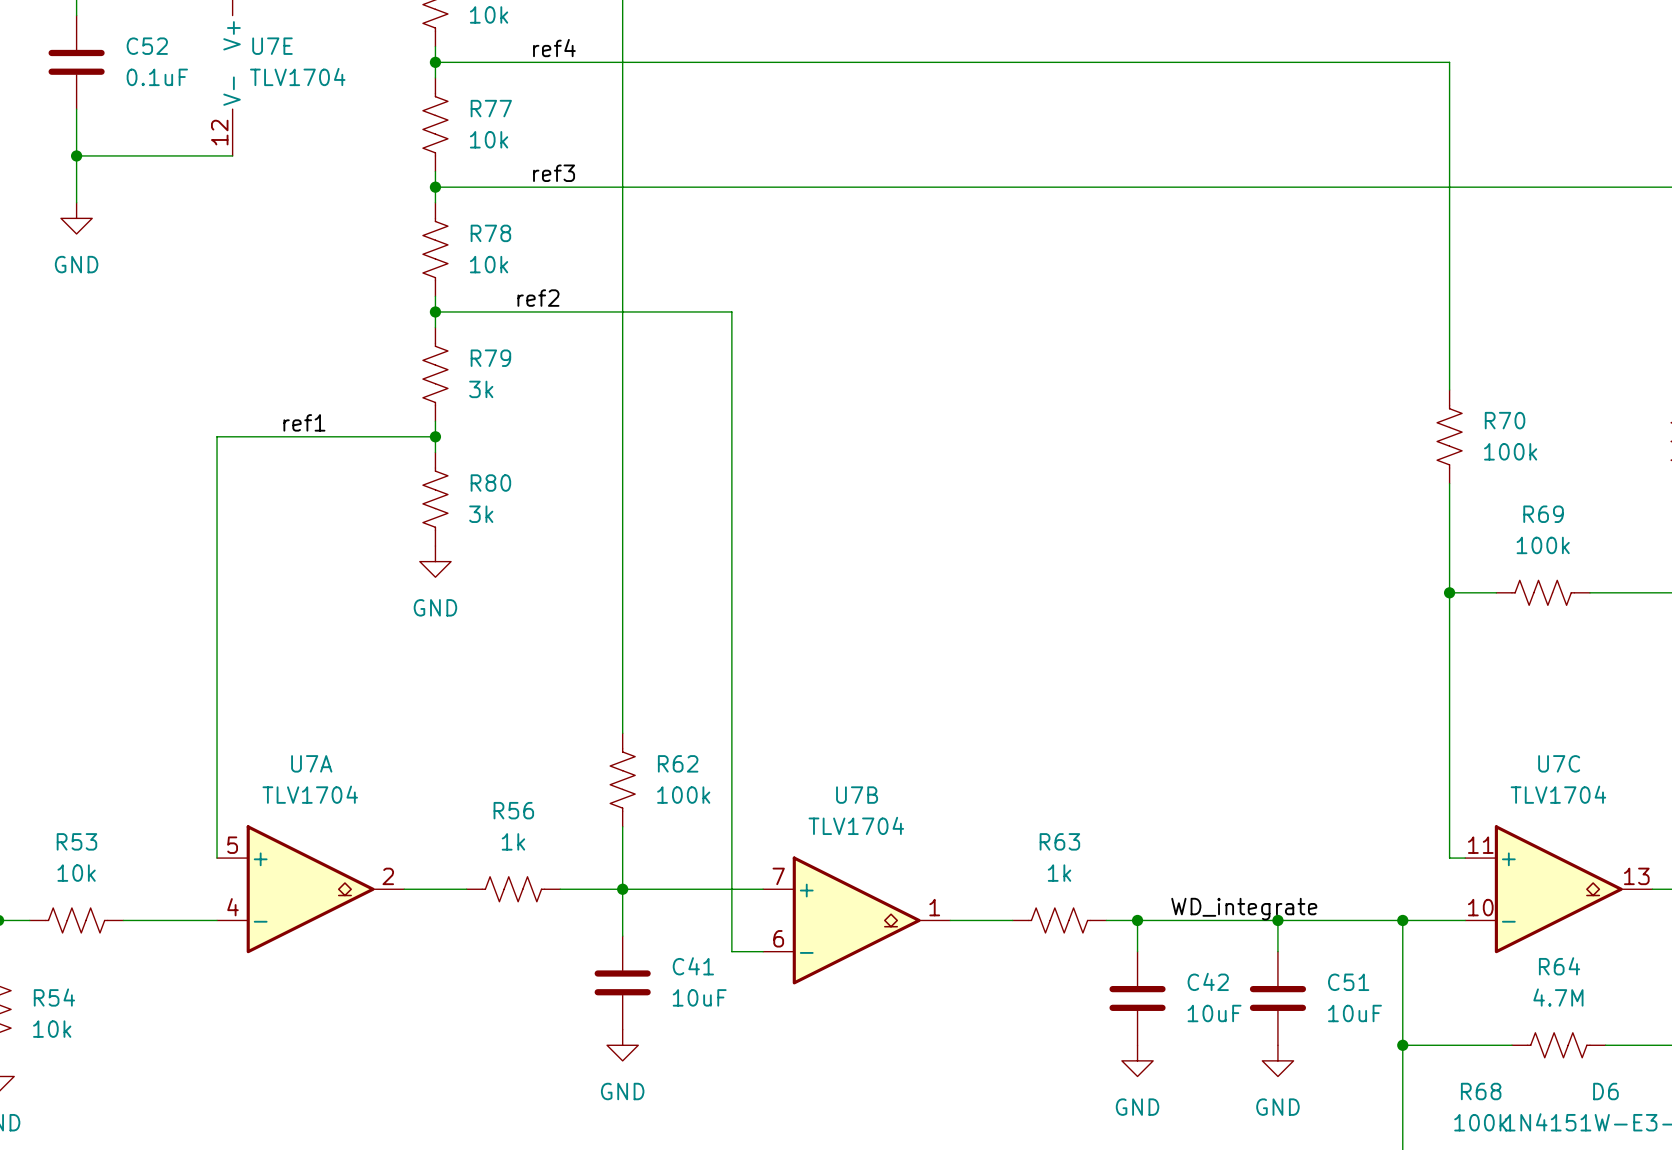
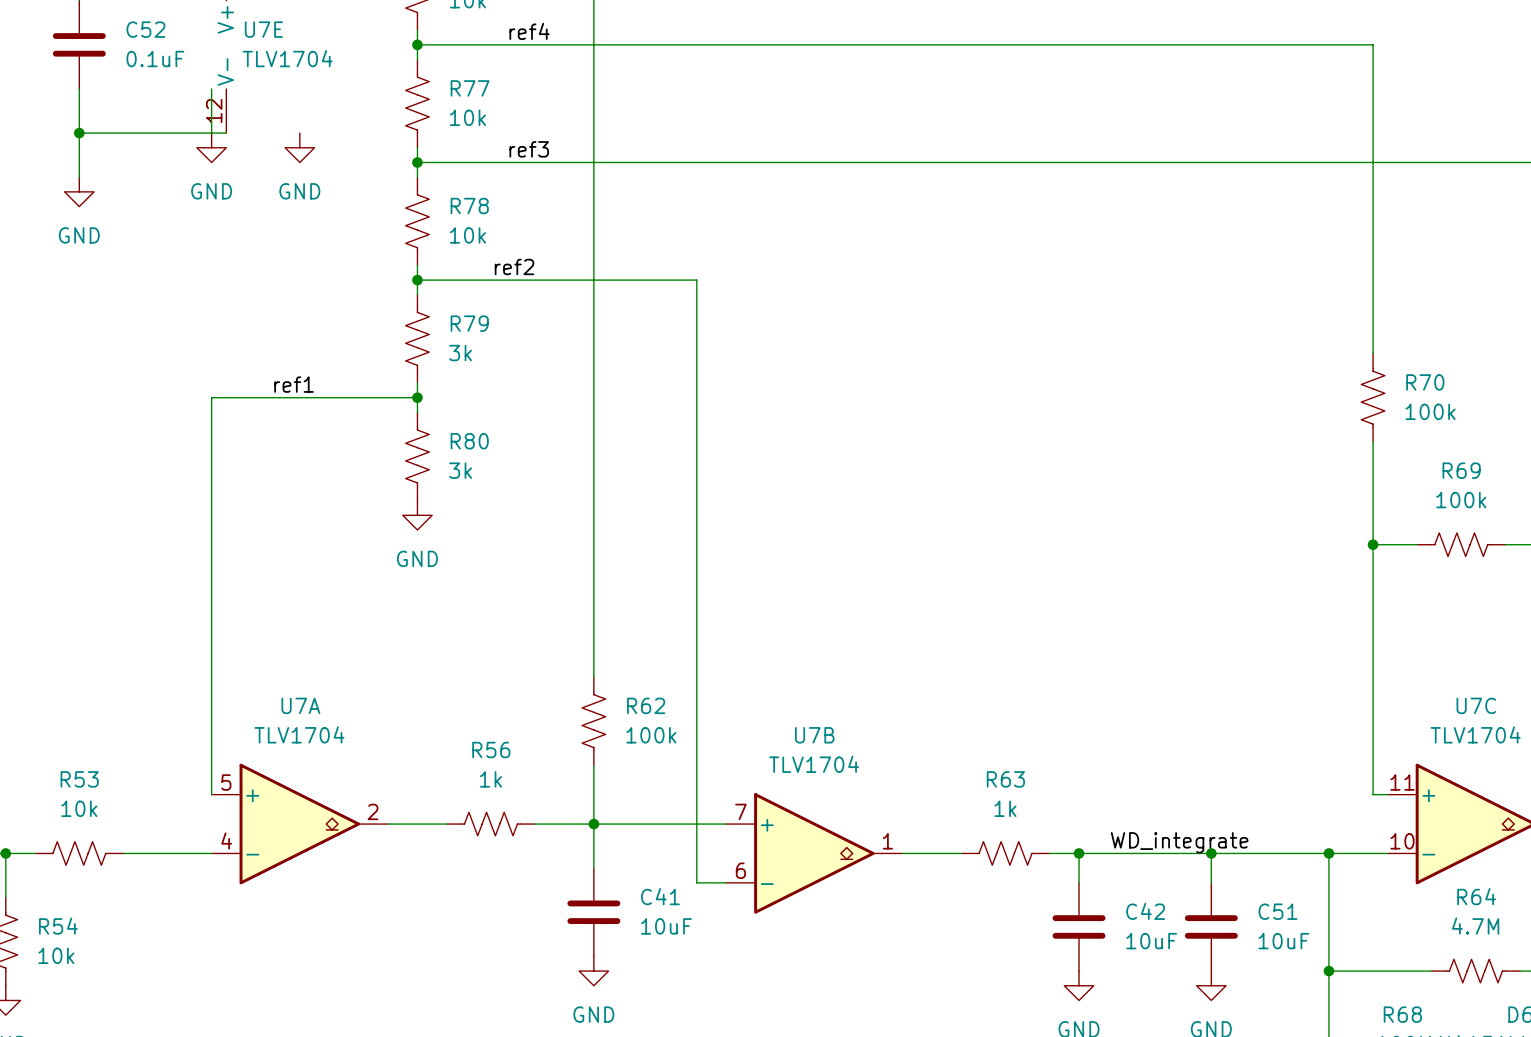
wire: none -> (211, 88) (211, 133)
power symbol: none -> GND (211, 147)
power symbol: none -> GND (299, 147)

